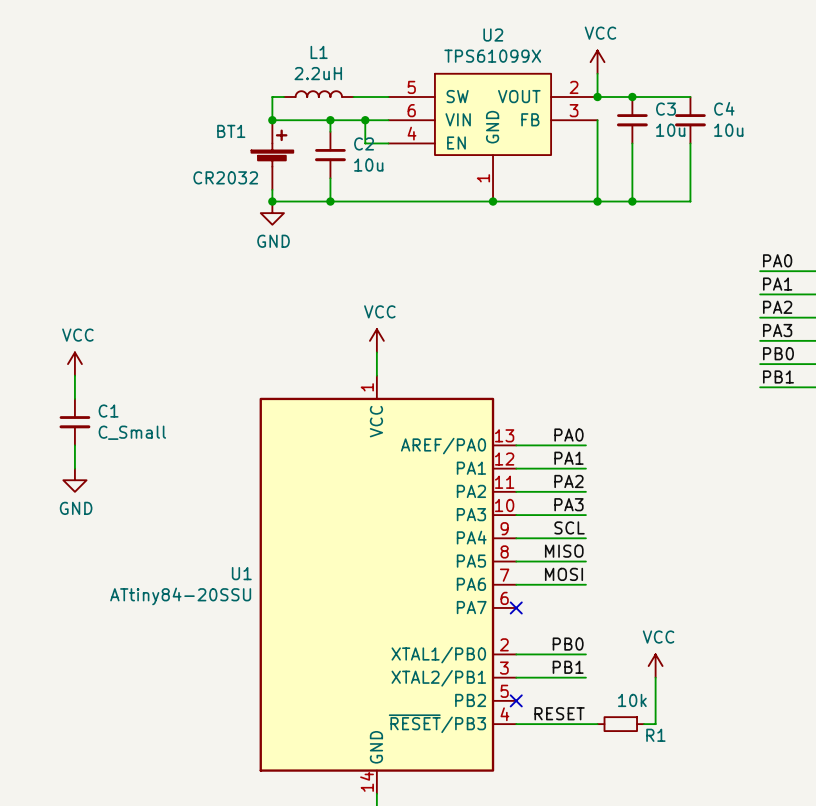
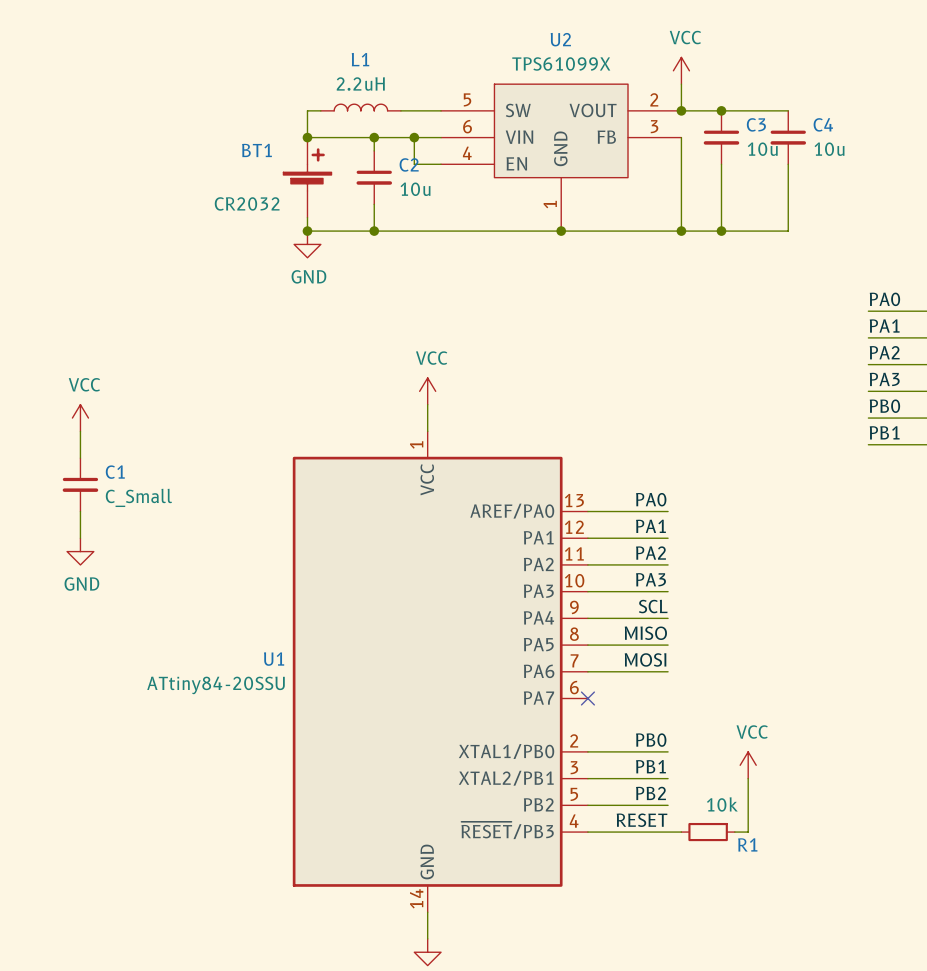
label: none -> PB2 (650, 793)
wire: none -> (587, 805) (668, 805)
no-connect mark: (516, 700) -> none

